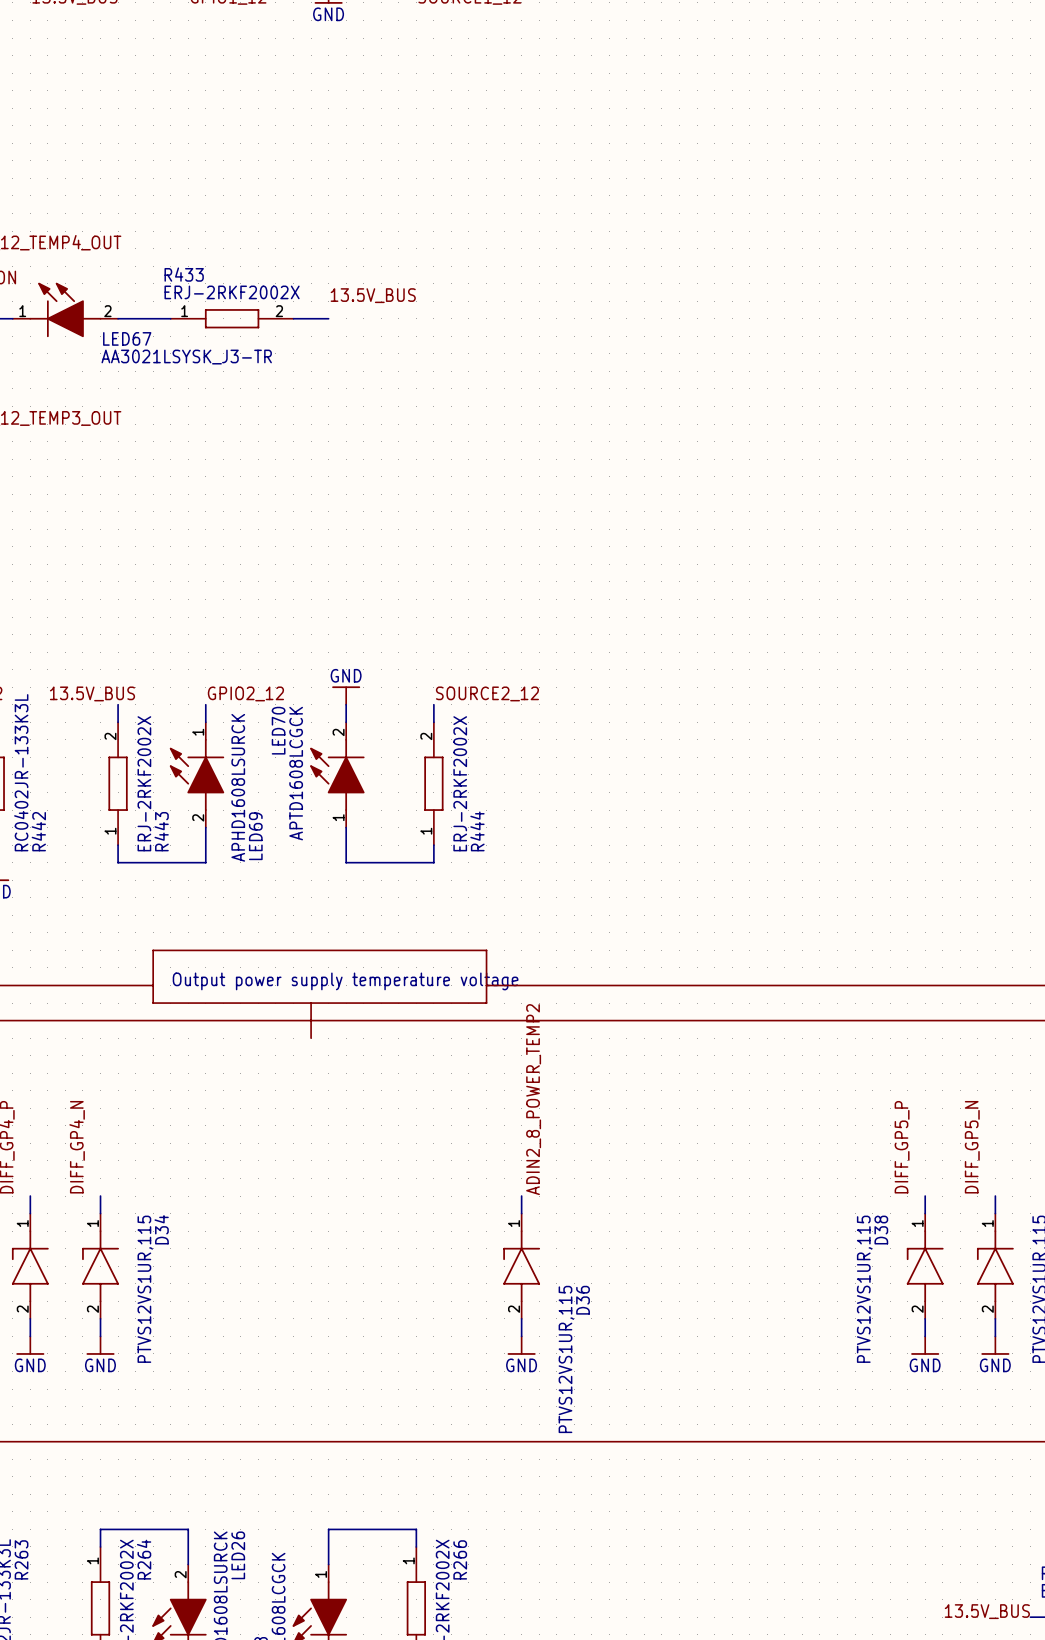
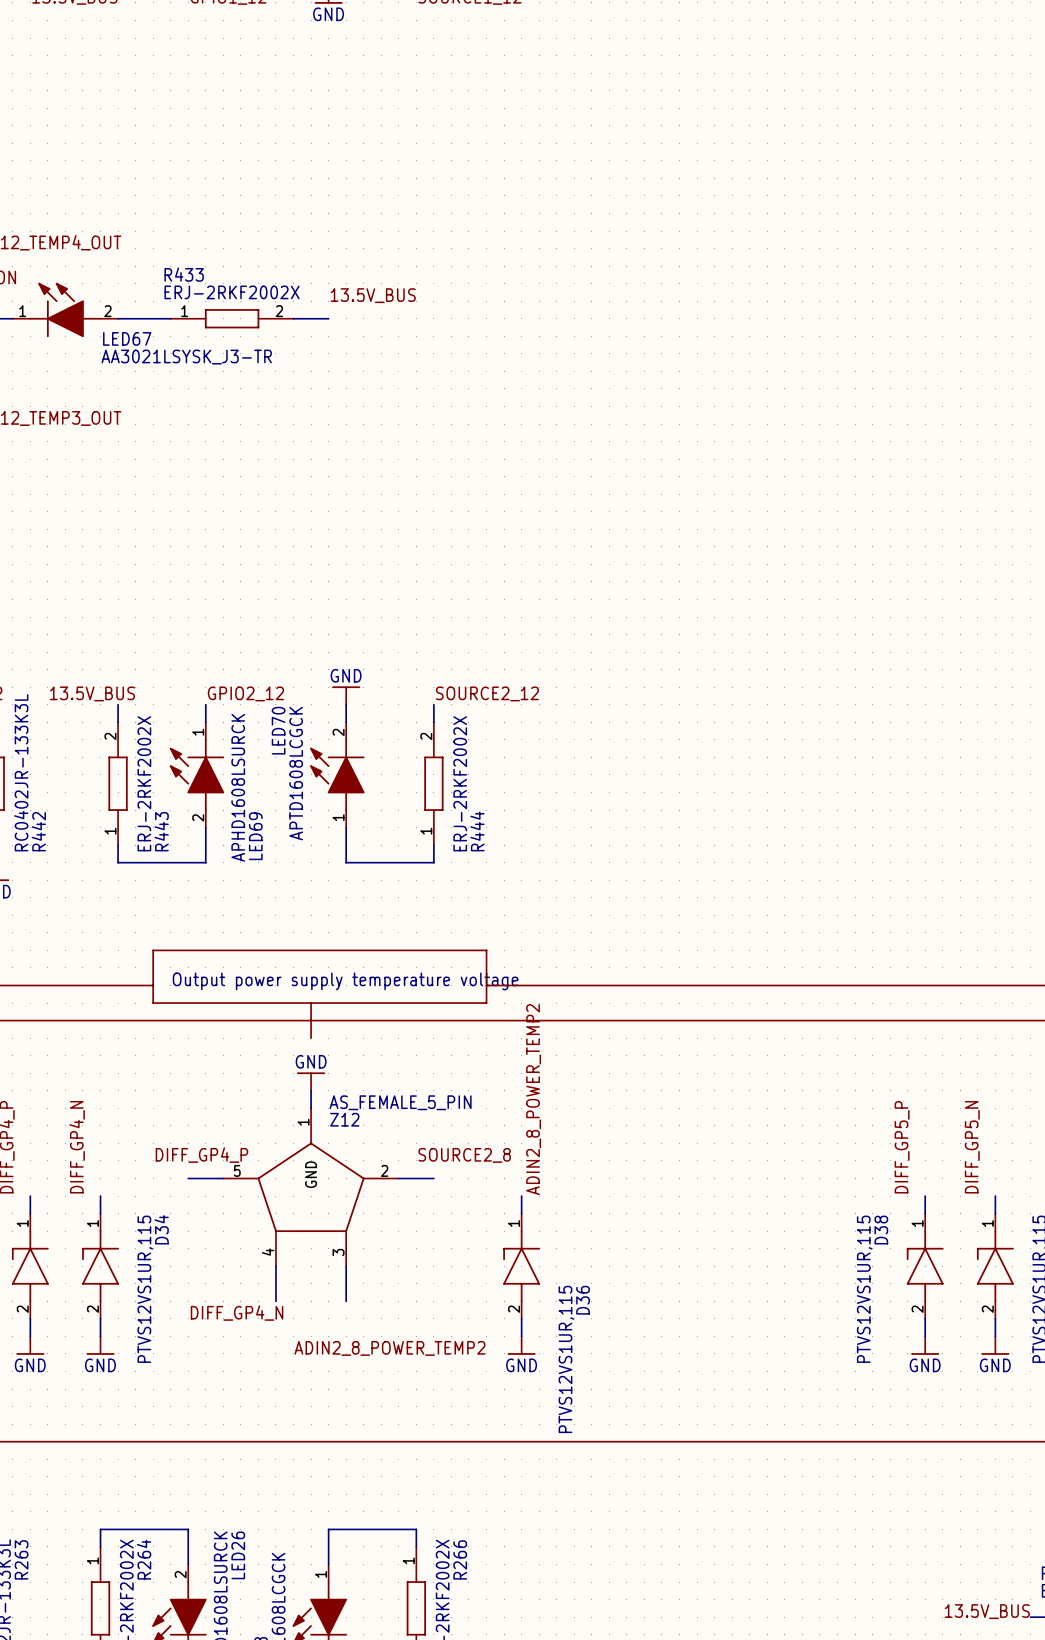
power symbol: none -> GND (311, 1081)
wire: none -> (311, 1090) (311, 1108)
label: none -> DIFF_GP4_P (201, 1155)
label: none -> SOURCE2_8 (464, 1155)
wire: none -> (188, 1178) (223, 1178)
wire: none -> (398, 1178) (433, 1178)
Z12: none -> AS_FEMALE_5_PIN (311, 1187)
wire: none -> (275, 1266) (275, 1301)
wire: none -> (346, 1266) (346, 1301)
label: none -> DIFF_GP4_N (237, 1313)
label: none -> ADIN2_8_POWER_TEMP2 (389, 1348)

